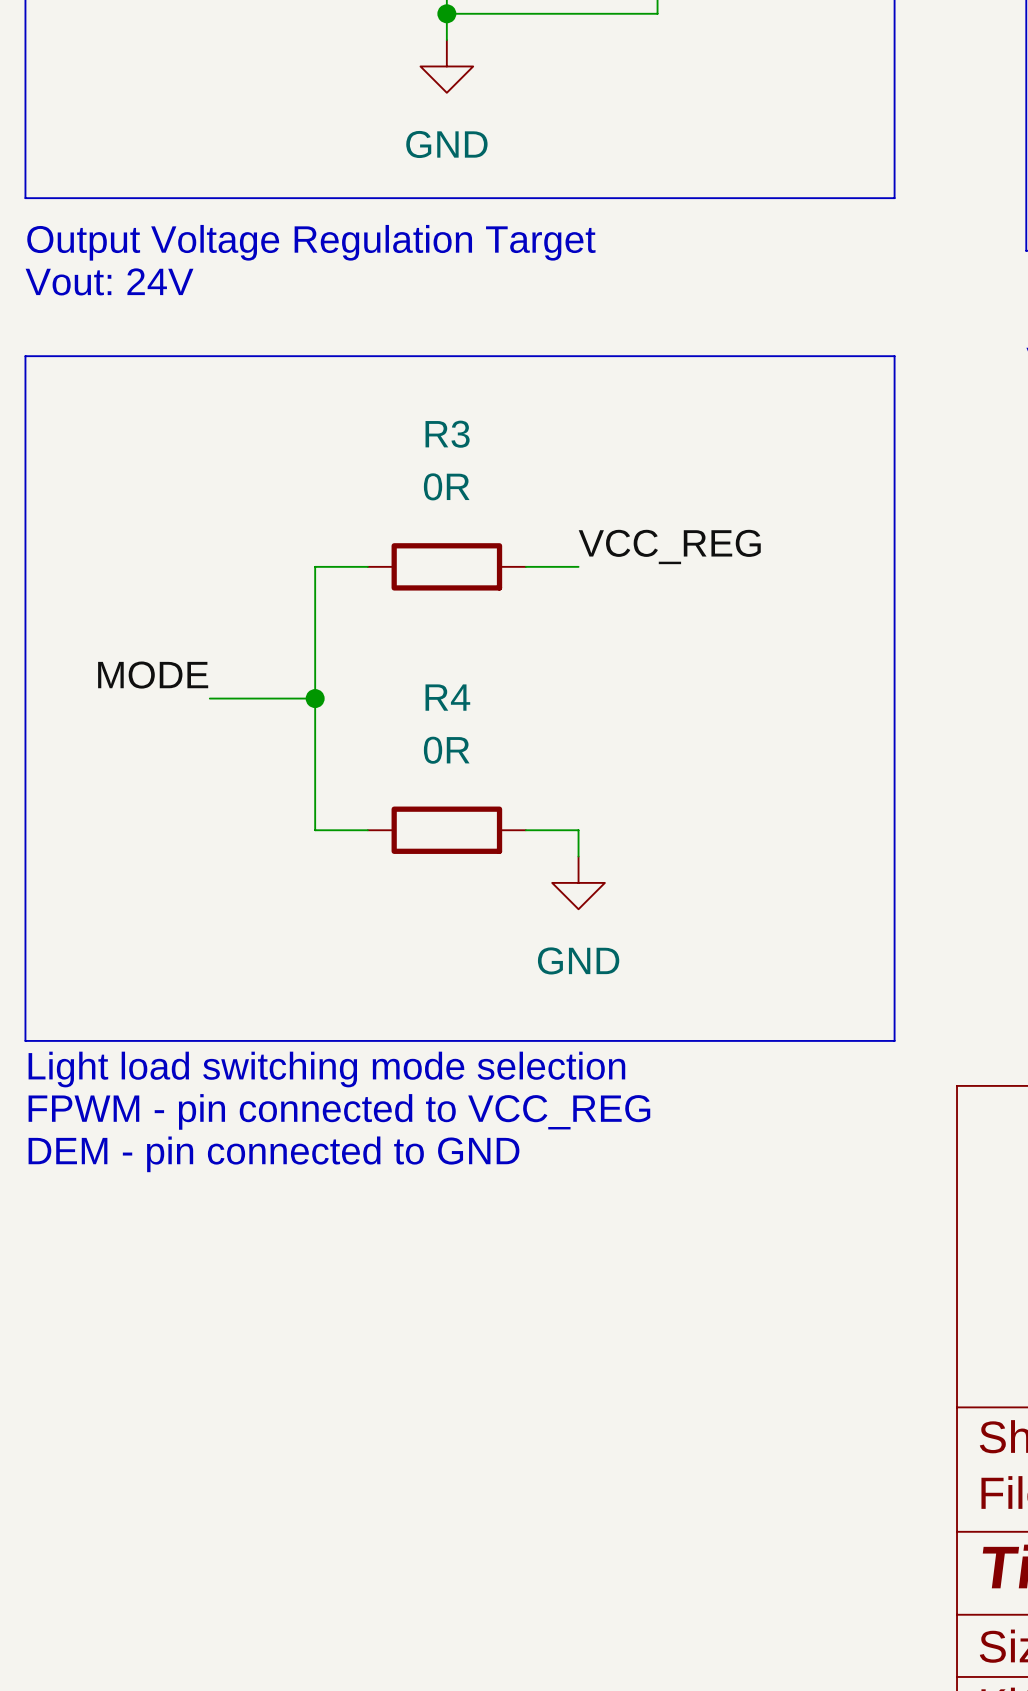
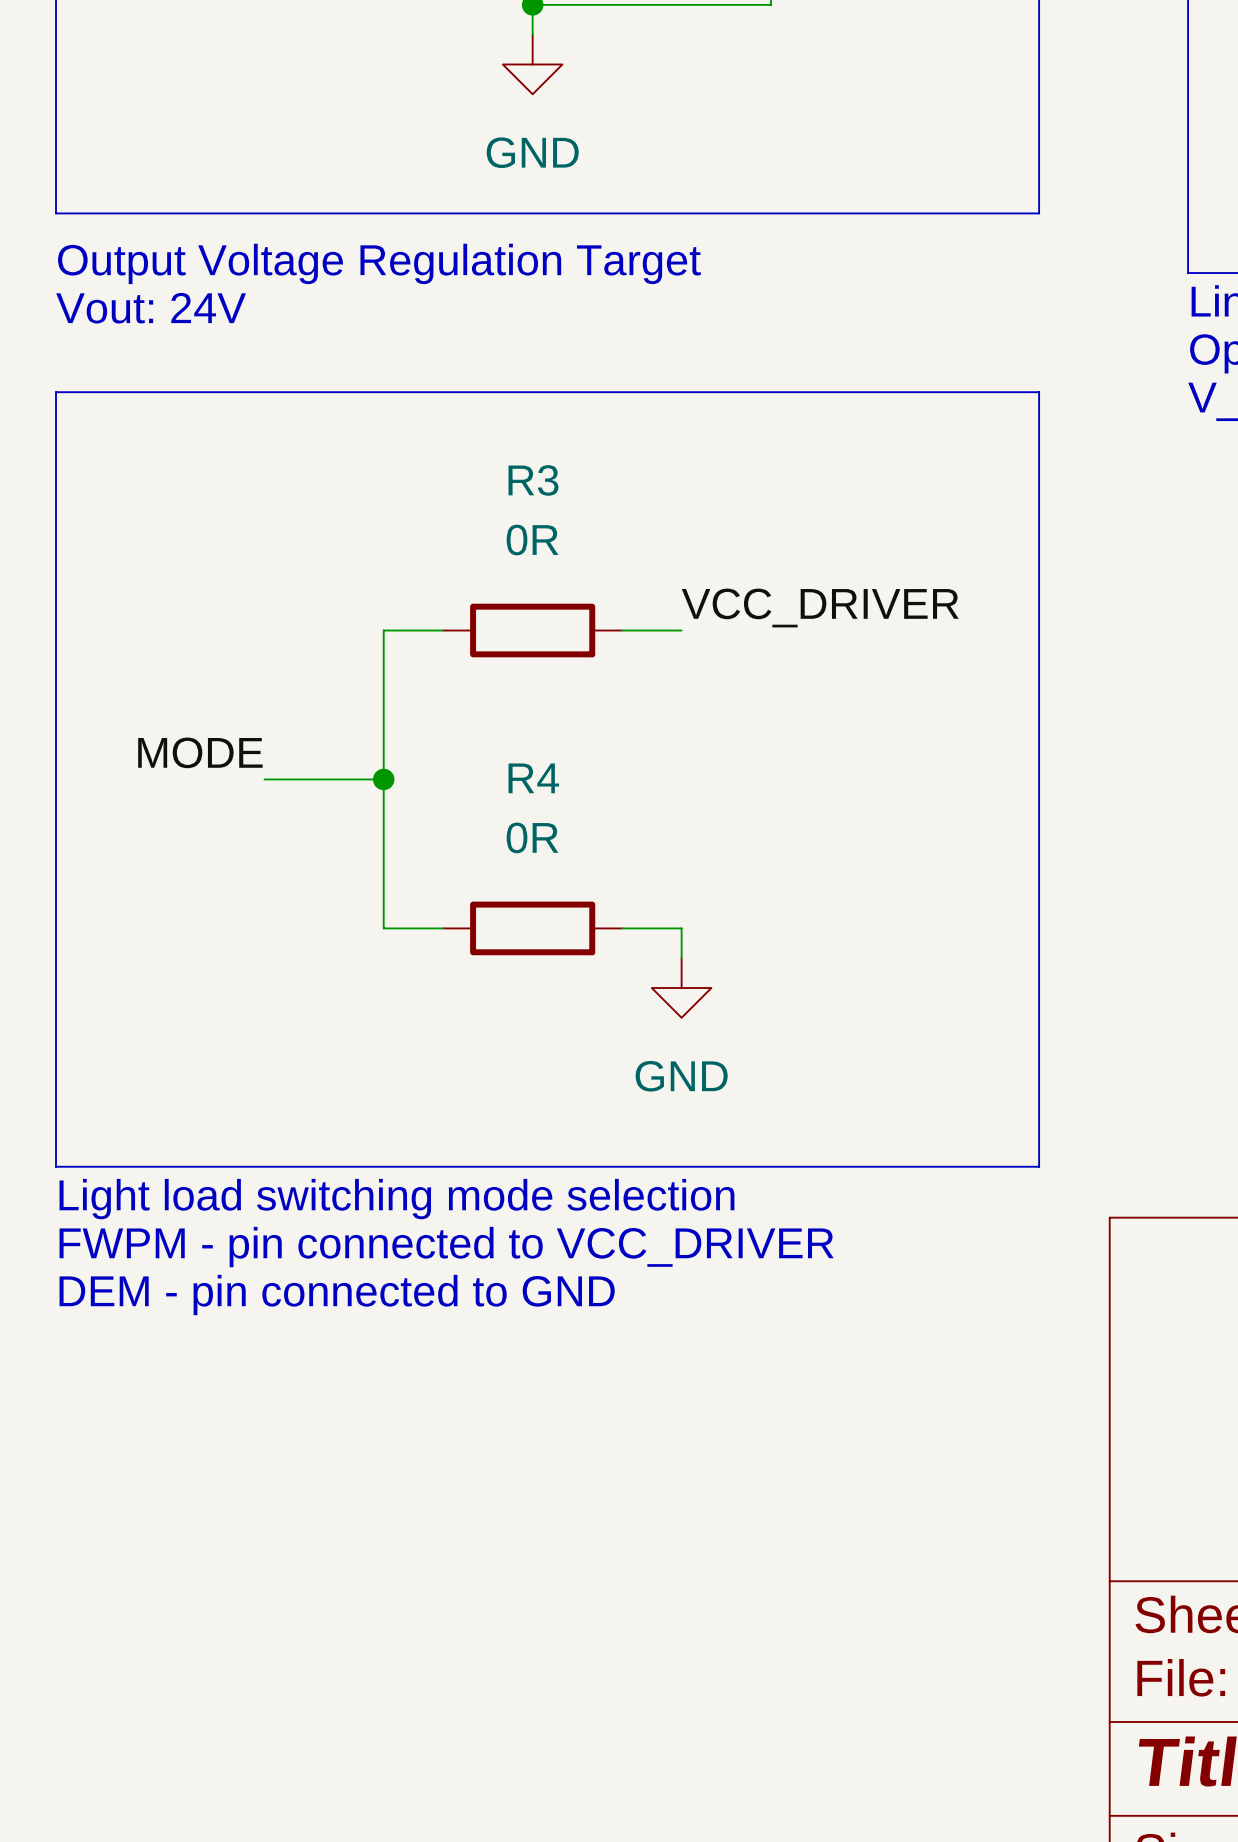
label: VCC_REG (669, 546) -> VCC_DRIVER (820, 608)
text: FPWM - pin connected to VCC_REG (339, 1111) -> FWPM - pin connected to VCC_DRIVER (446, 1247)

